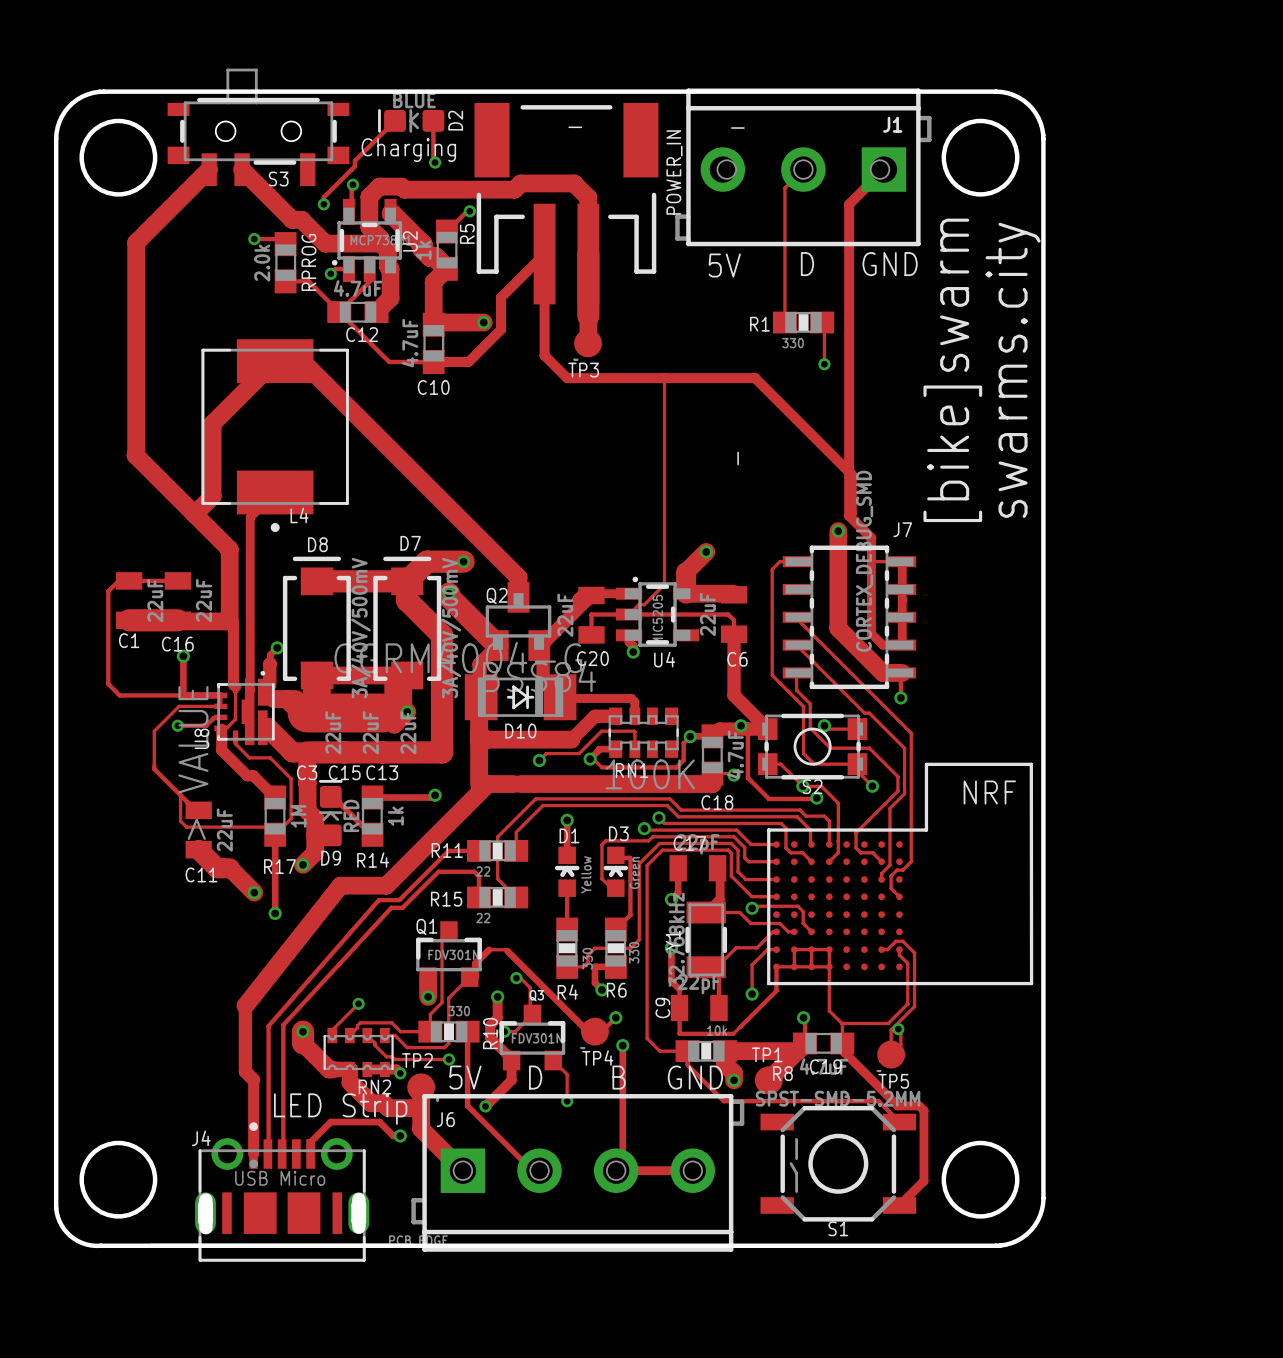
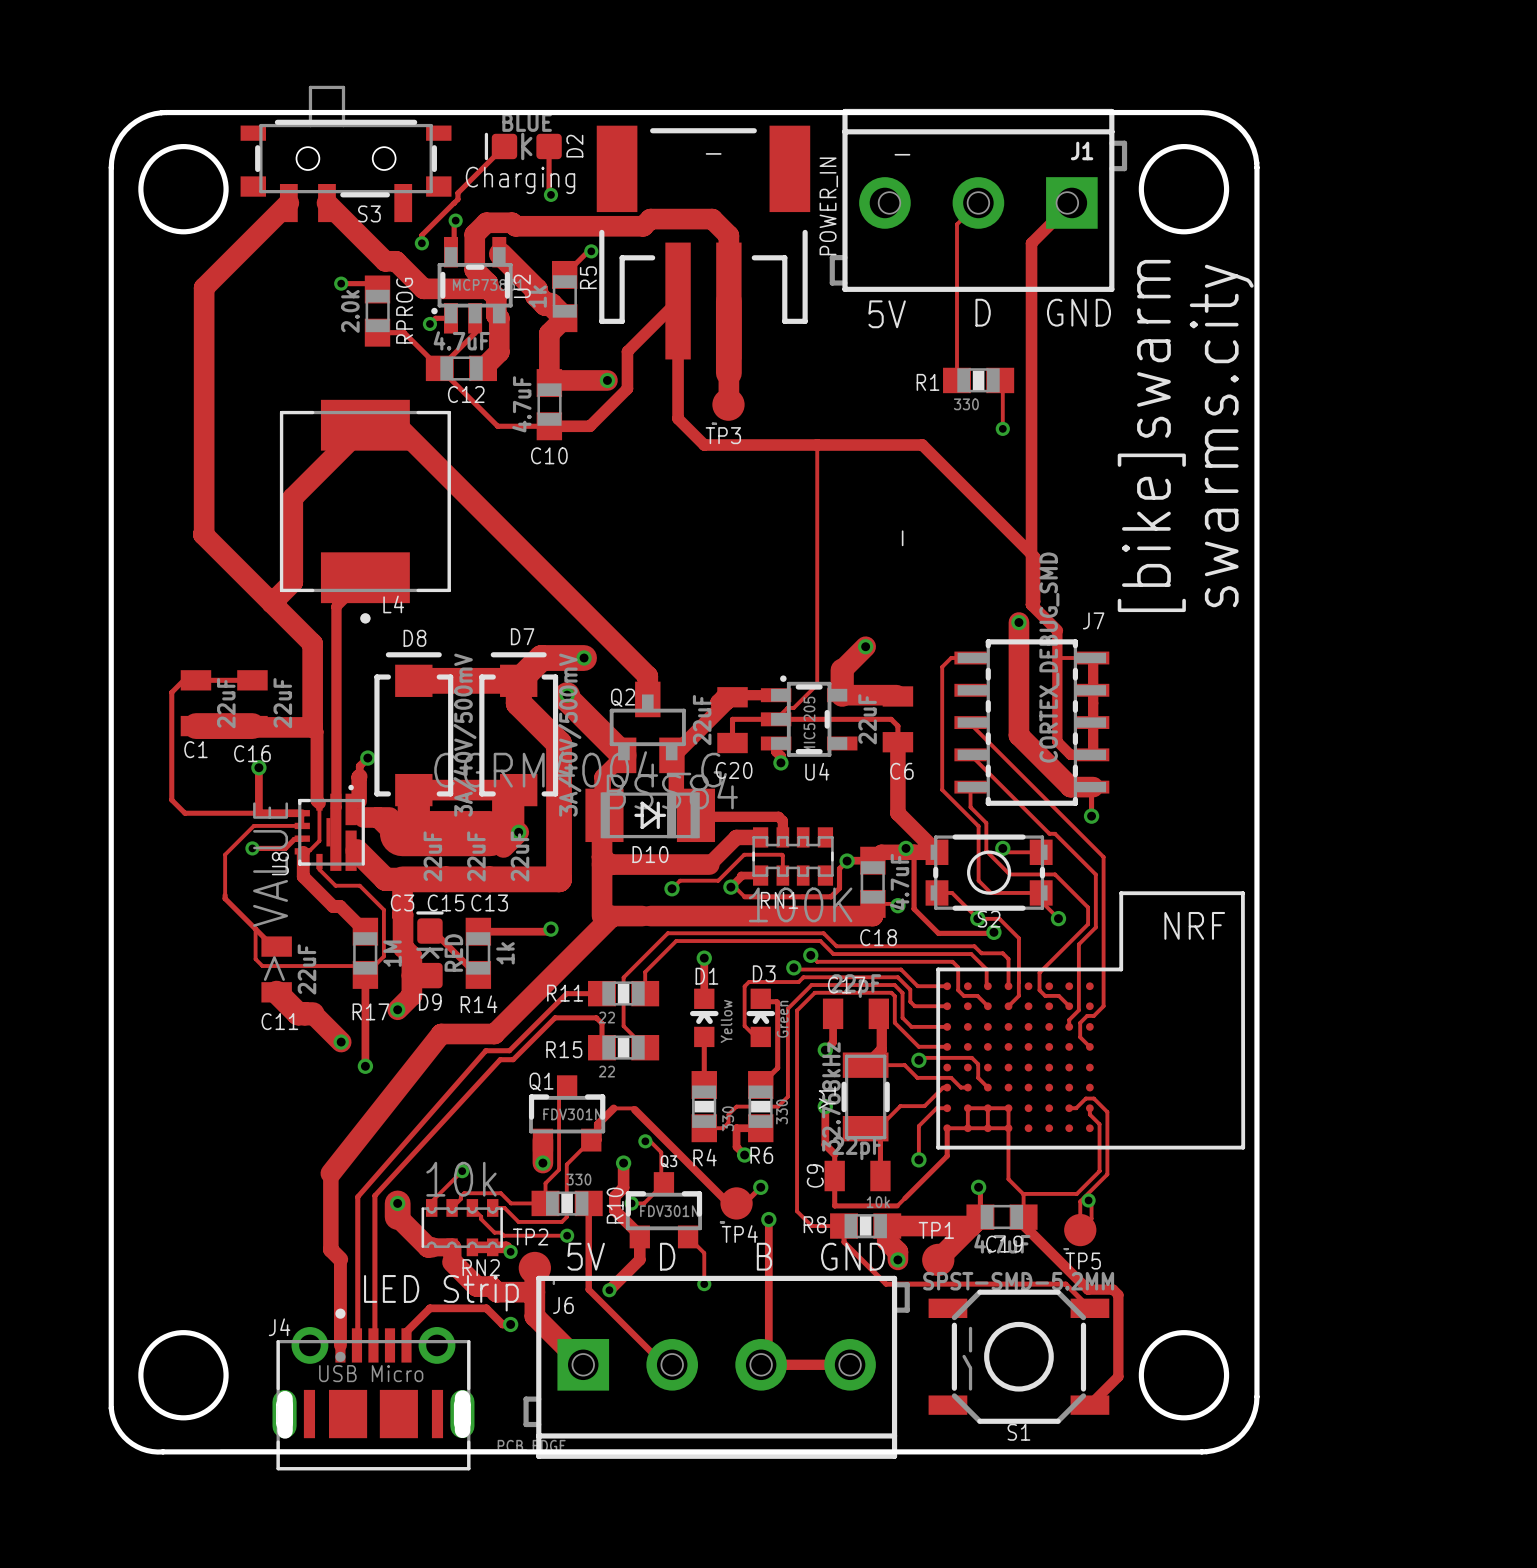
RN2 value: none -> 10k (461, 1179)
R8 name position: R8 (782, 1073) -> R8 (815, 1224)

